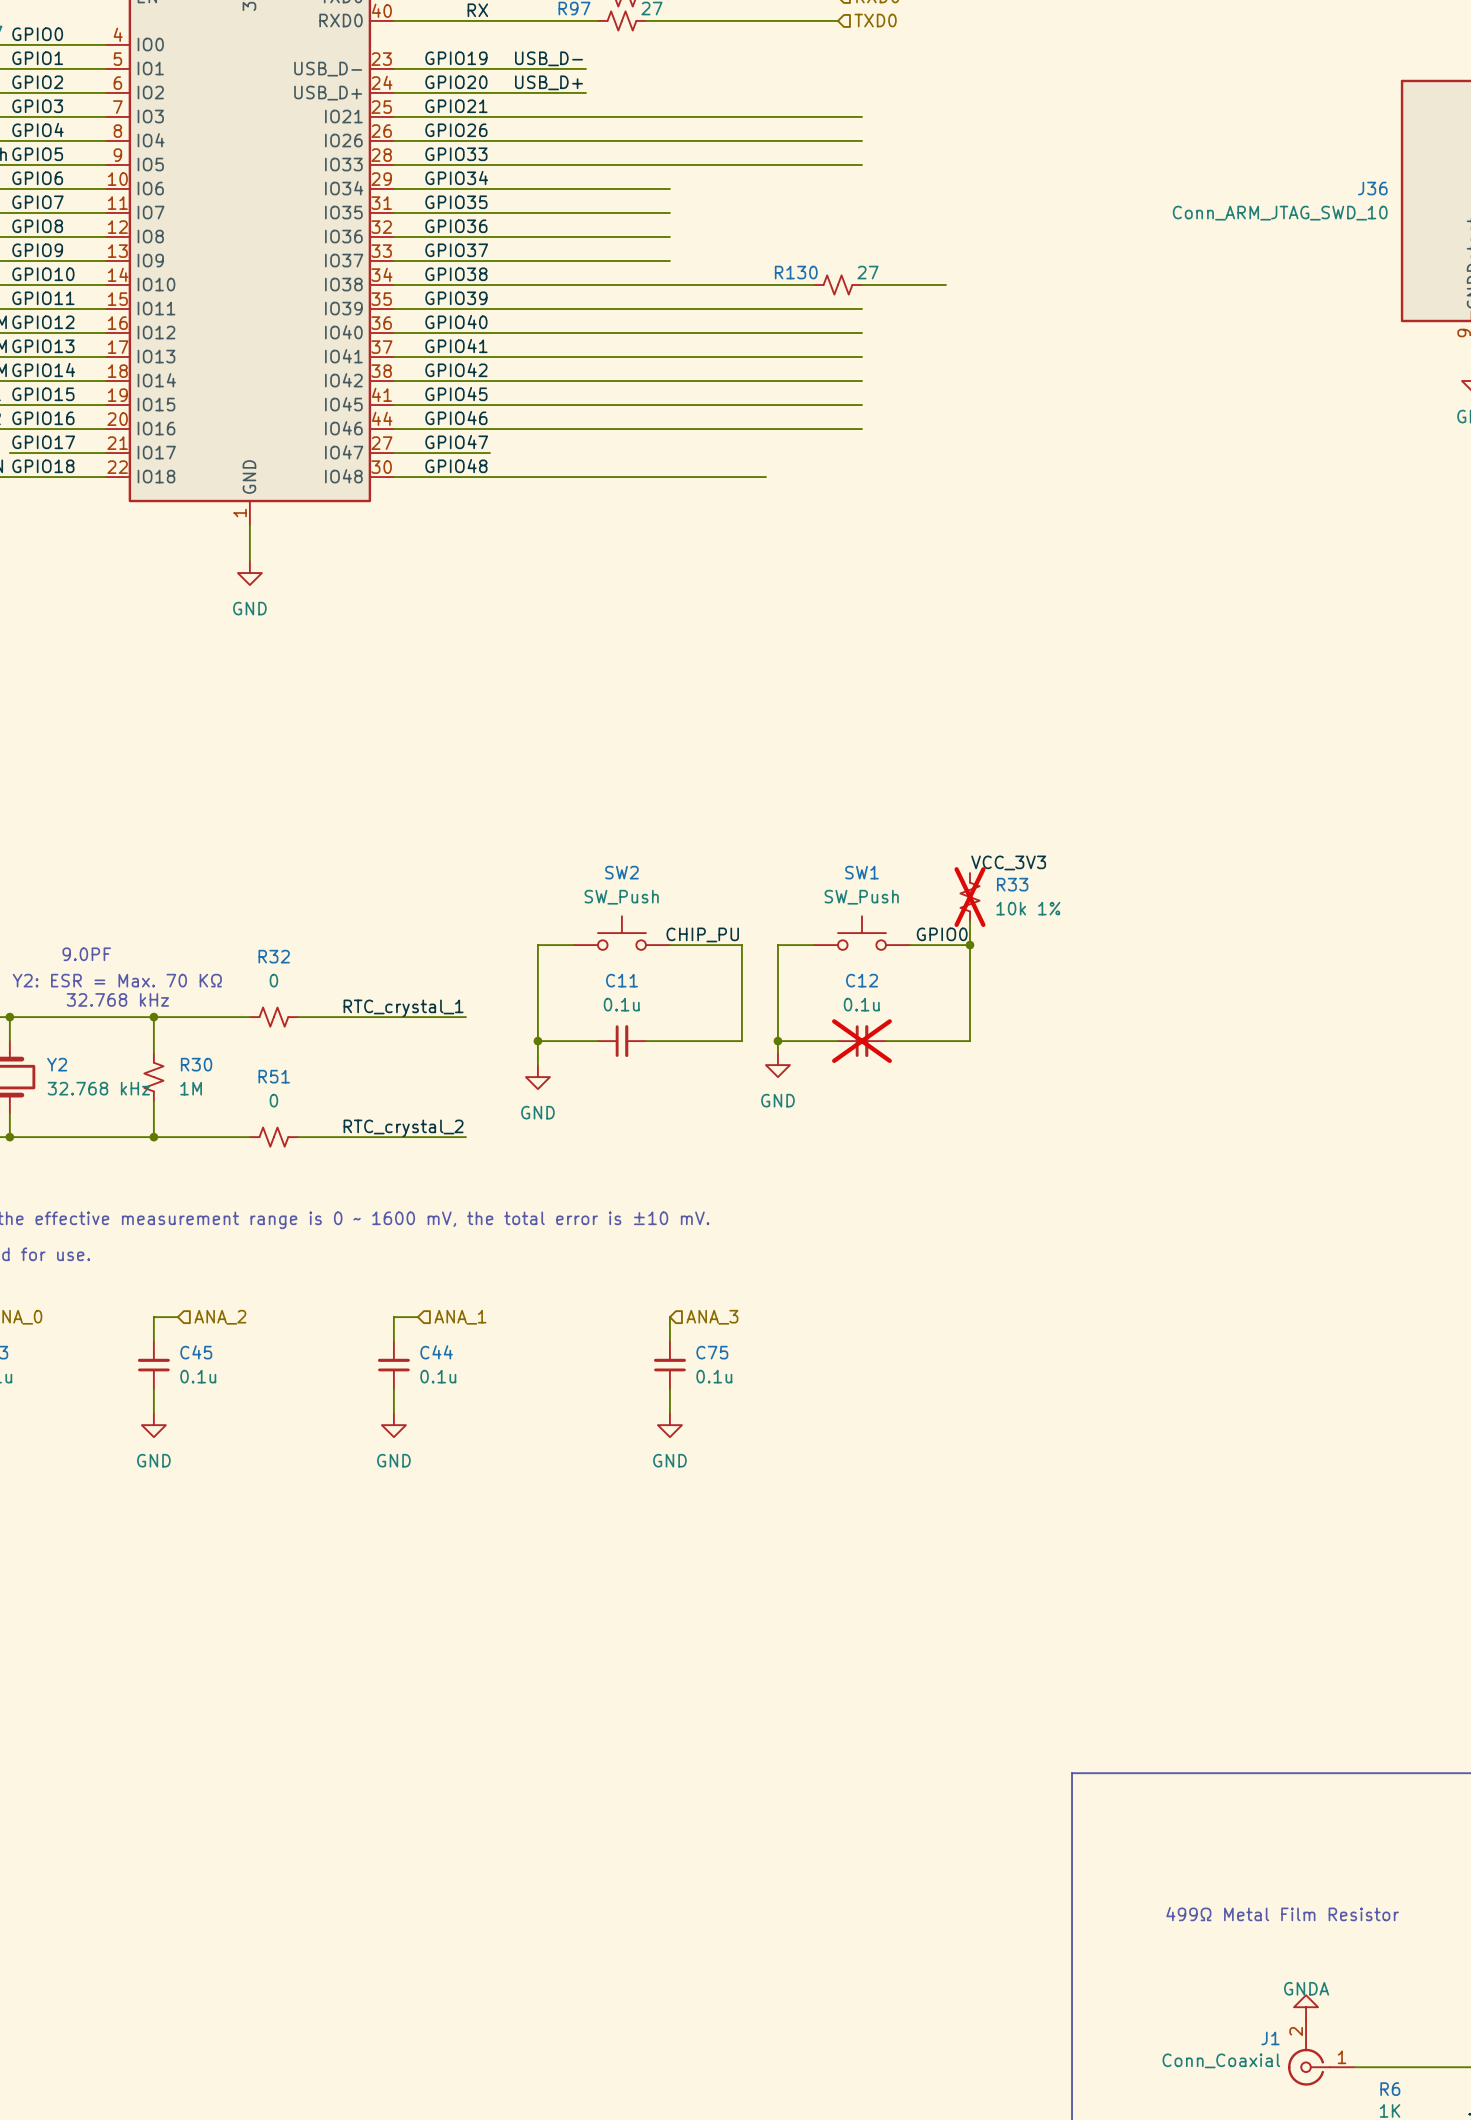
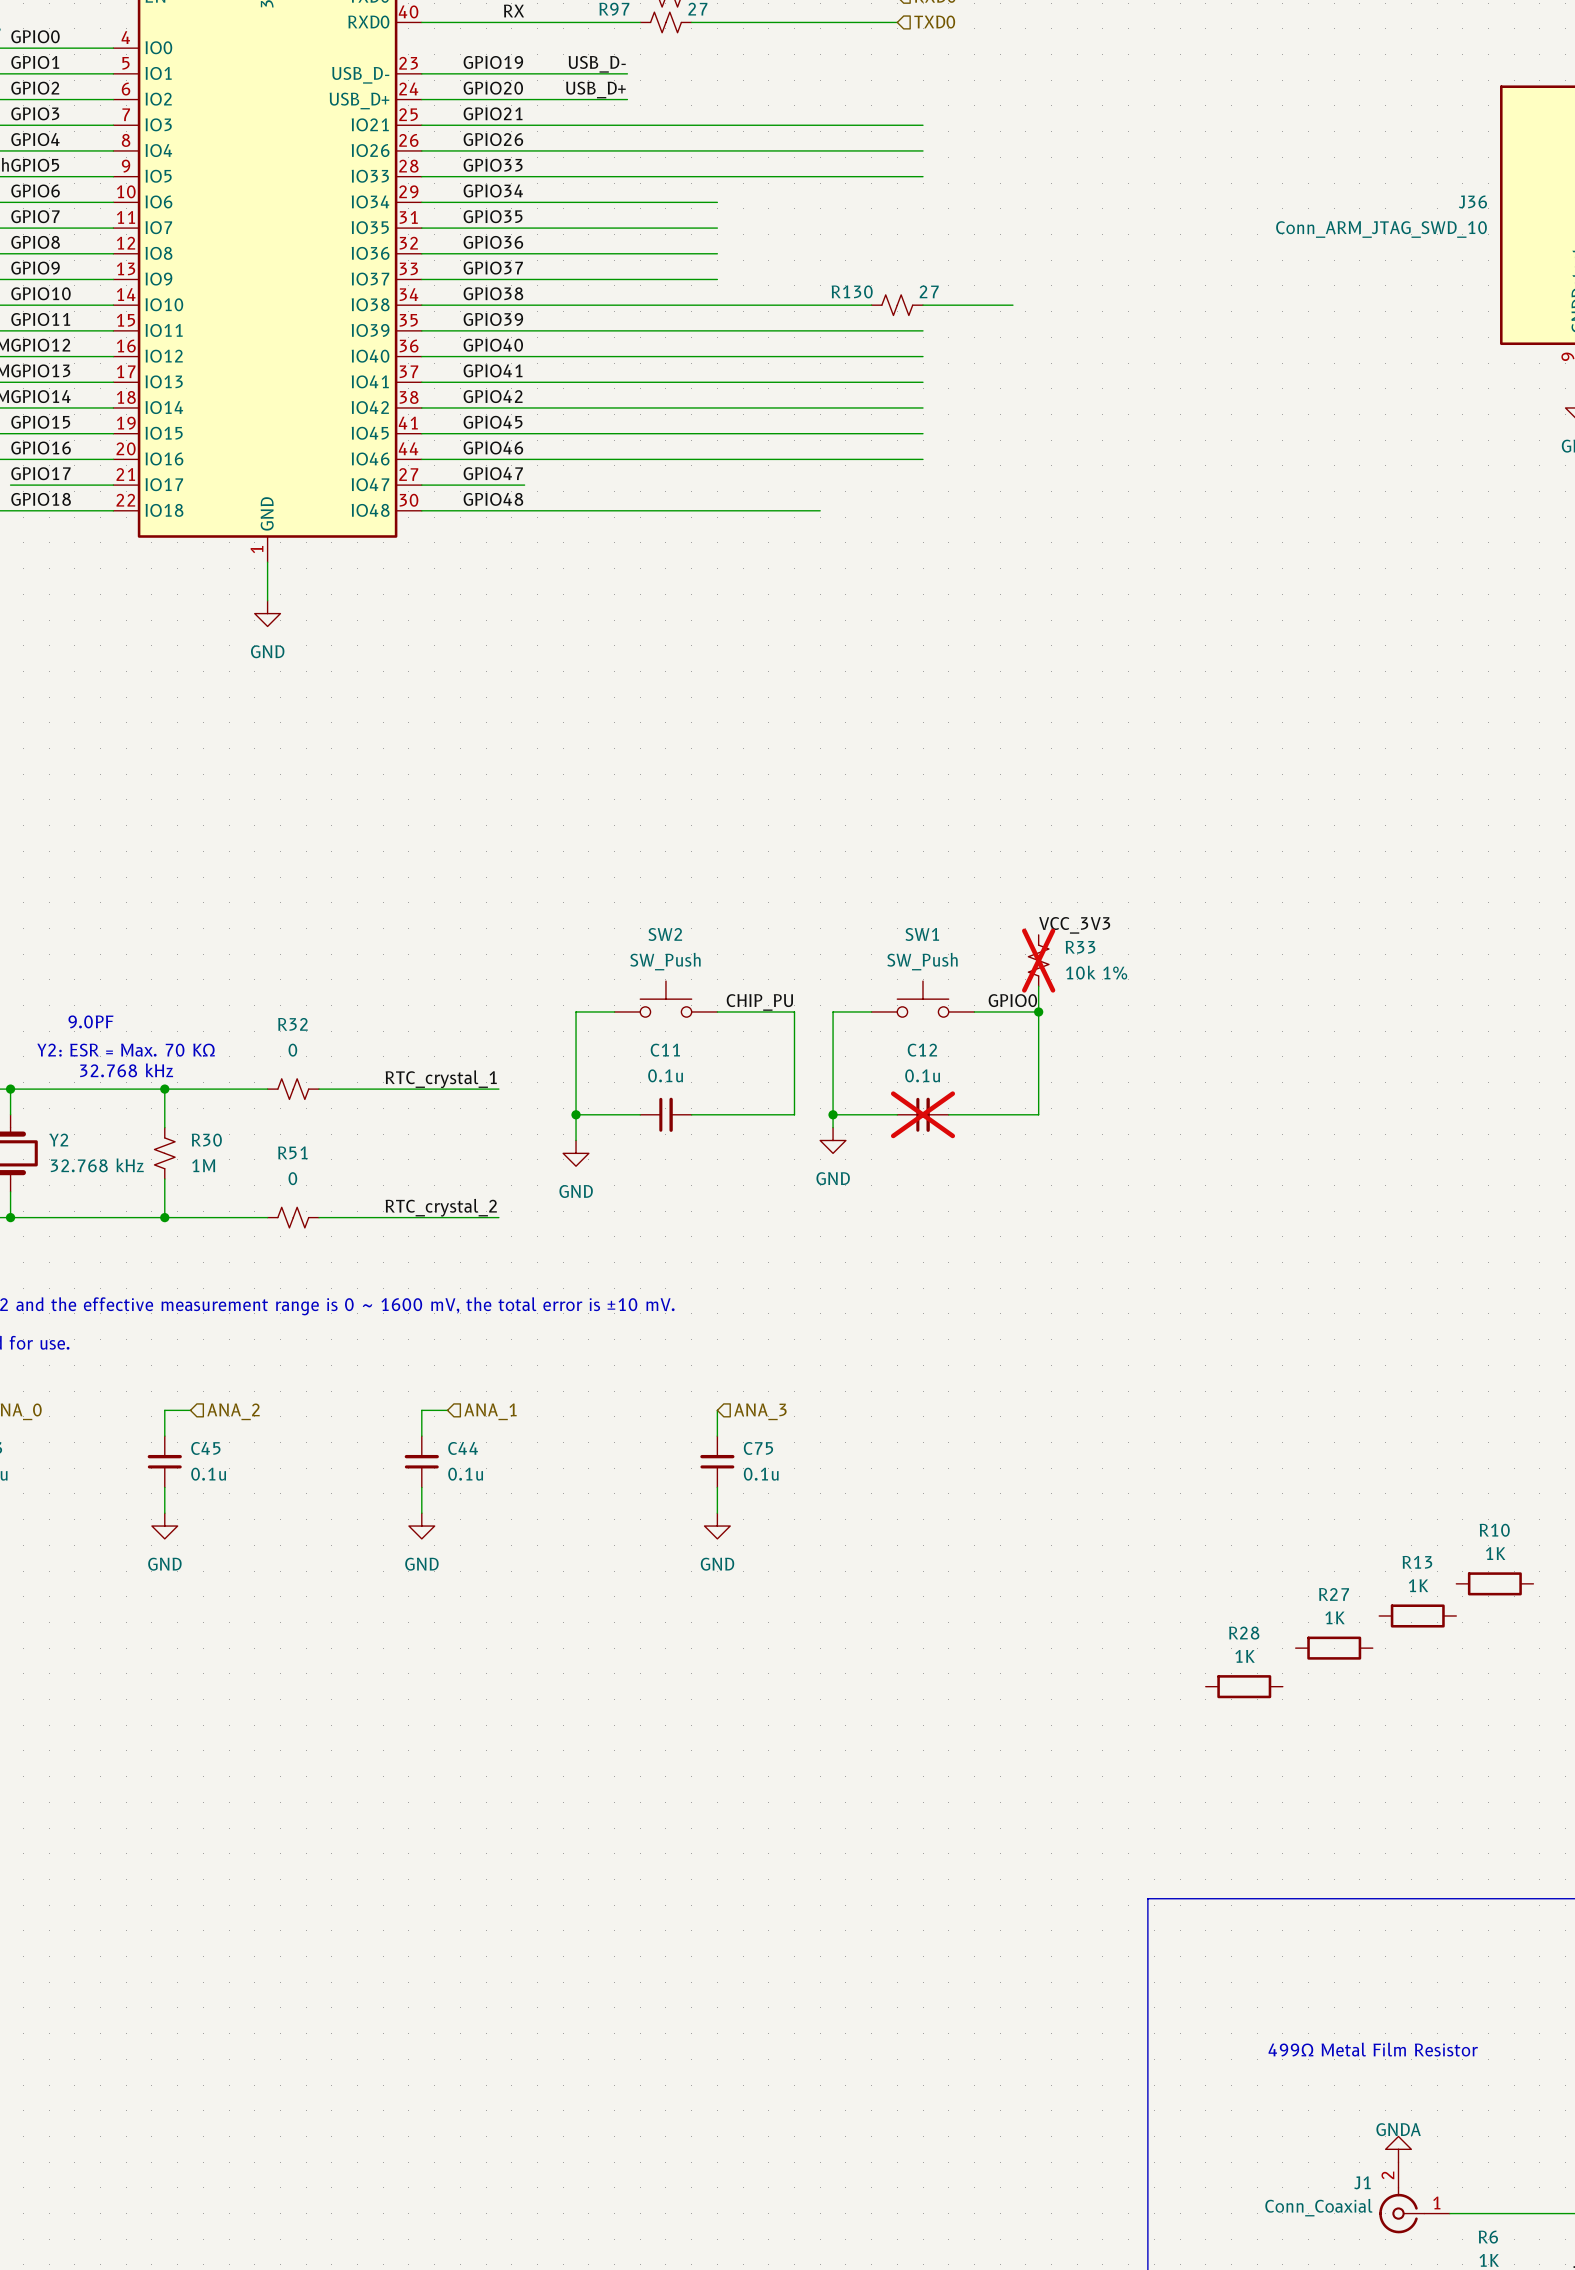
R10: none -> 1K (1494, 1583)
R13: none -> 1K (1417, 1615)
R27: none -> 1K (1334, 1648)
R28: none -> 1K (1244, 1686)

